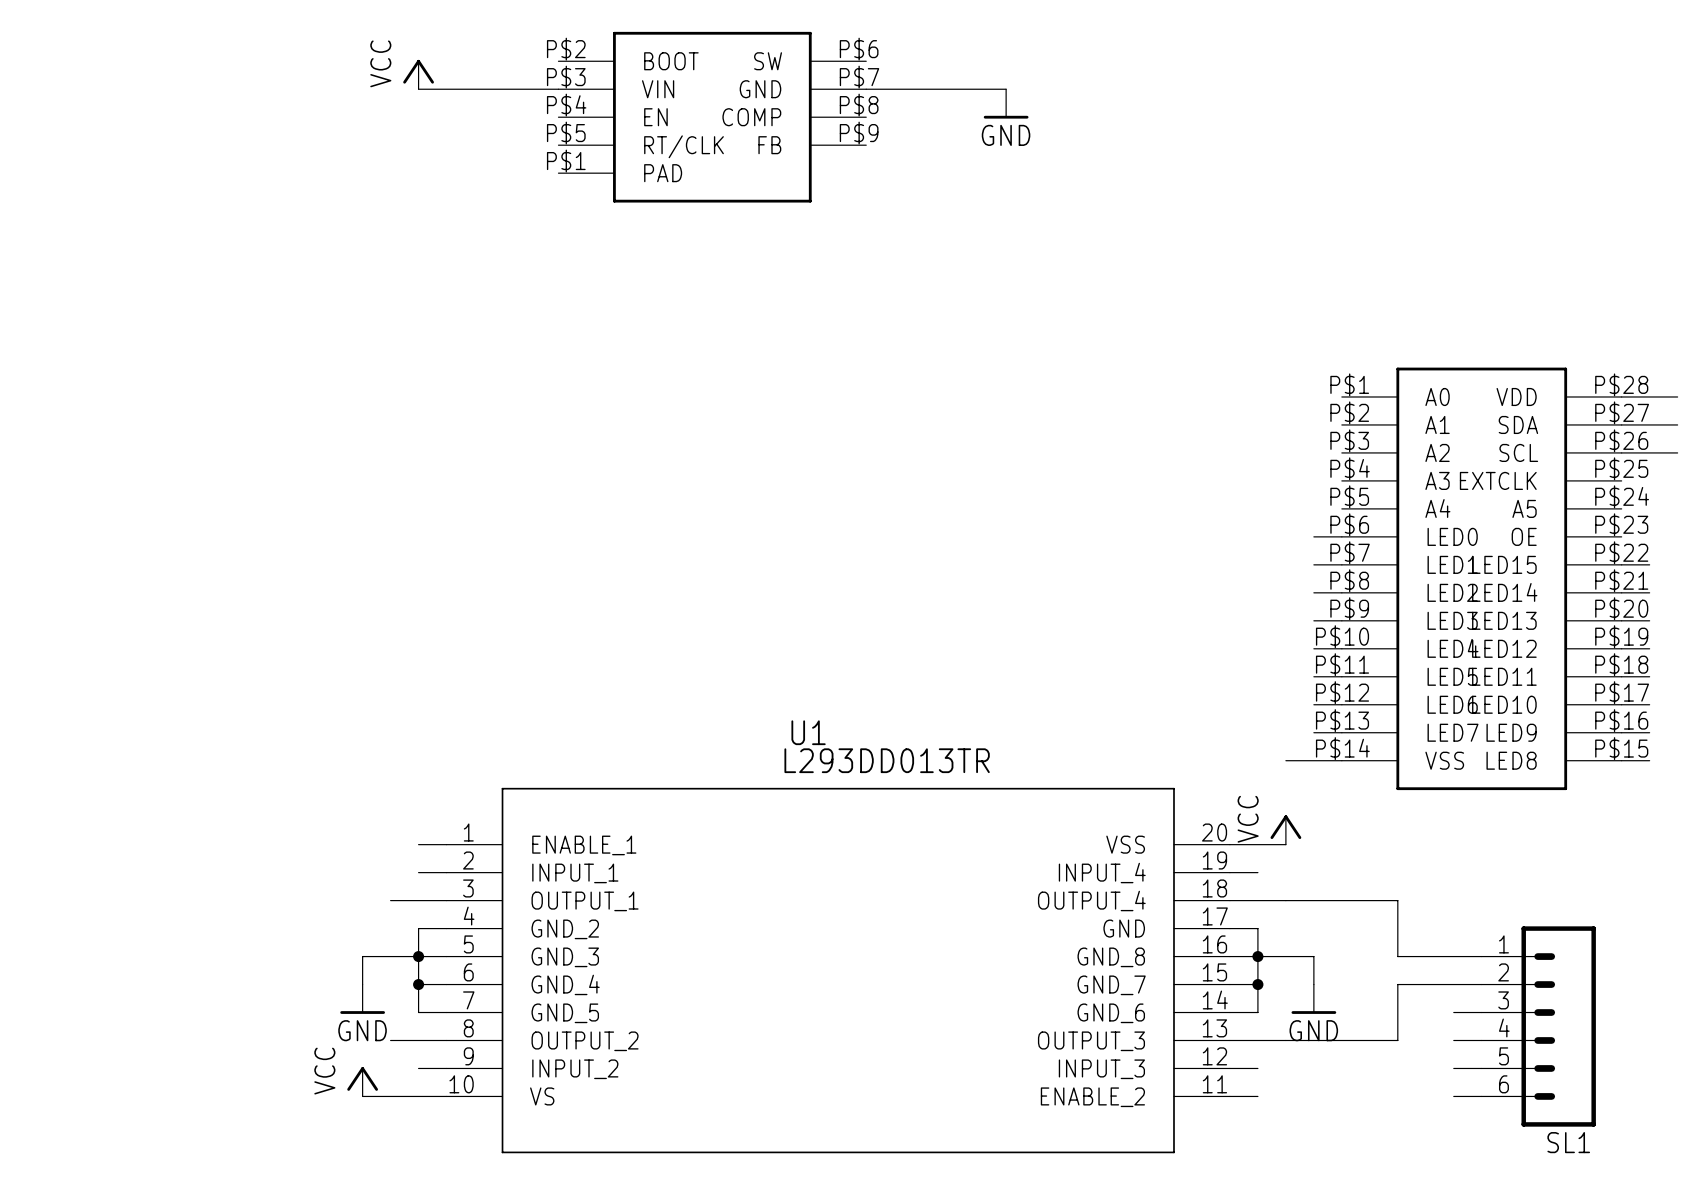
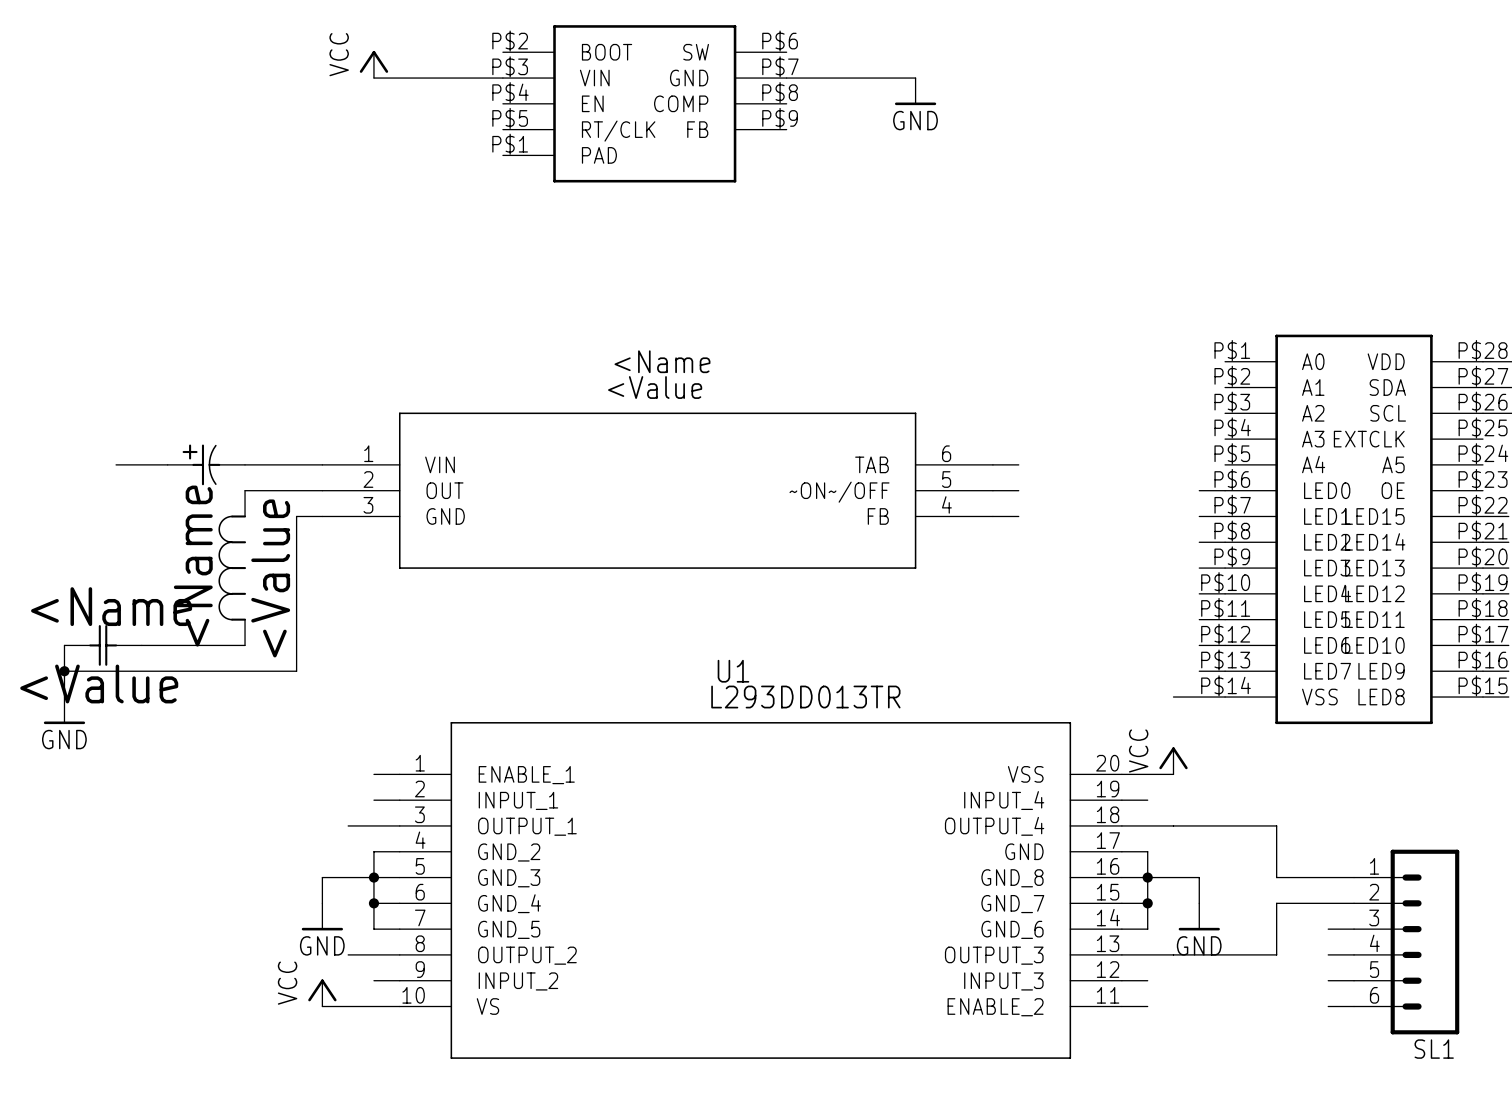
wire: none -> (116, 464) (167, 464)
part: none -> (206, 464)
wire: none -> (245, 464) (322, 464)
wire: none -> (992, 464) (1018, 464)
wire: none -> (245, 490) (322, 490)
part: none -> (657, 490)
wire: none -> (992, 490) (1018, 490)
wire: none -> (322, 516) (296, 516) (296, 671) (64, 671)
wire: none -> (992, 516) (1018, 516)
part: none -> (232, 568)
wire: none -> (64, 645) (64, 697)
part: none -> (103, 645)
wire: none -> (141, 645) (245, 645)
junction: none -> (64, 671)
power symbol: none -> GND (64, 710)

